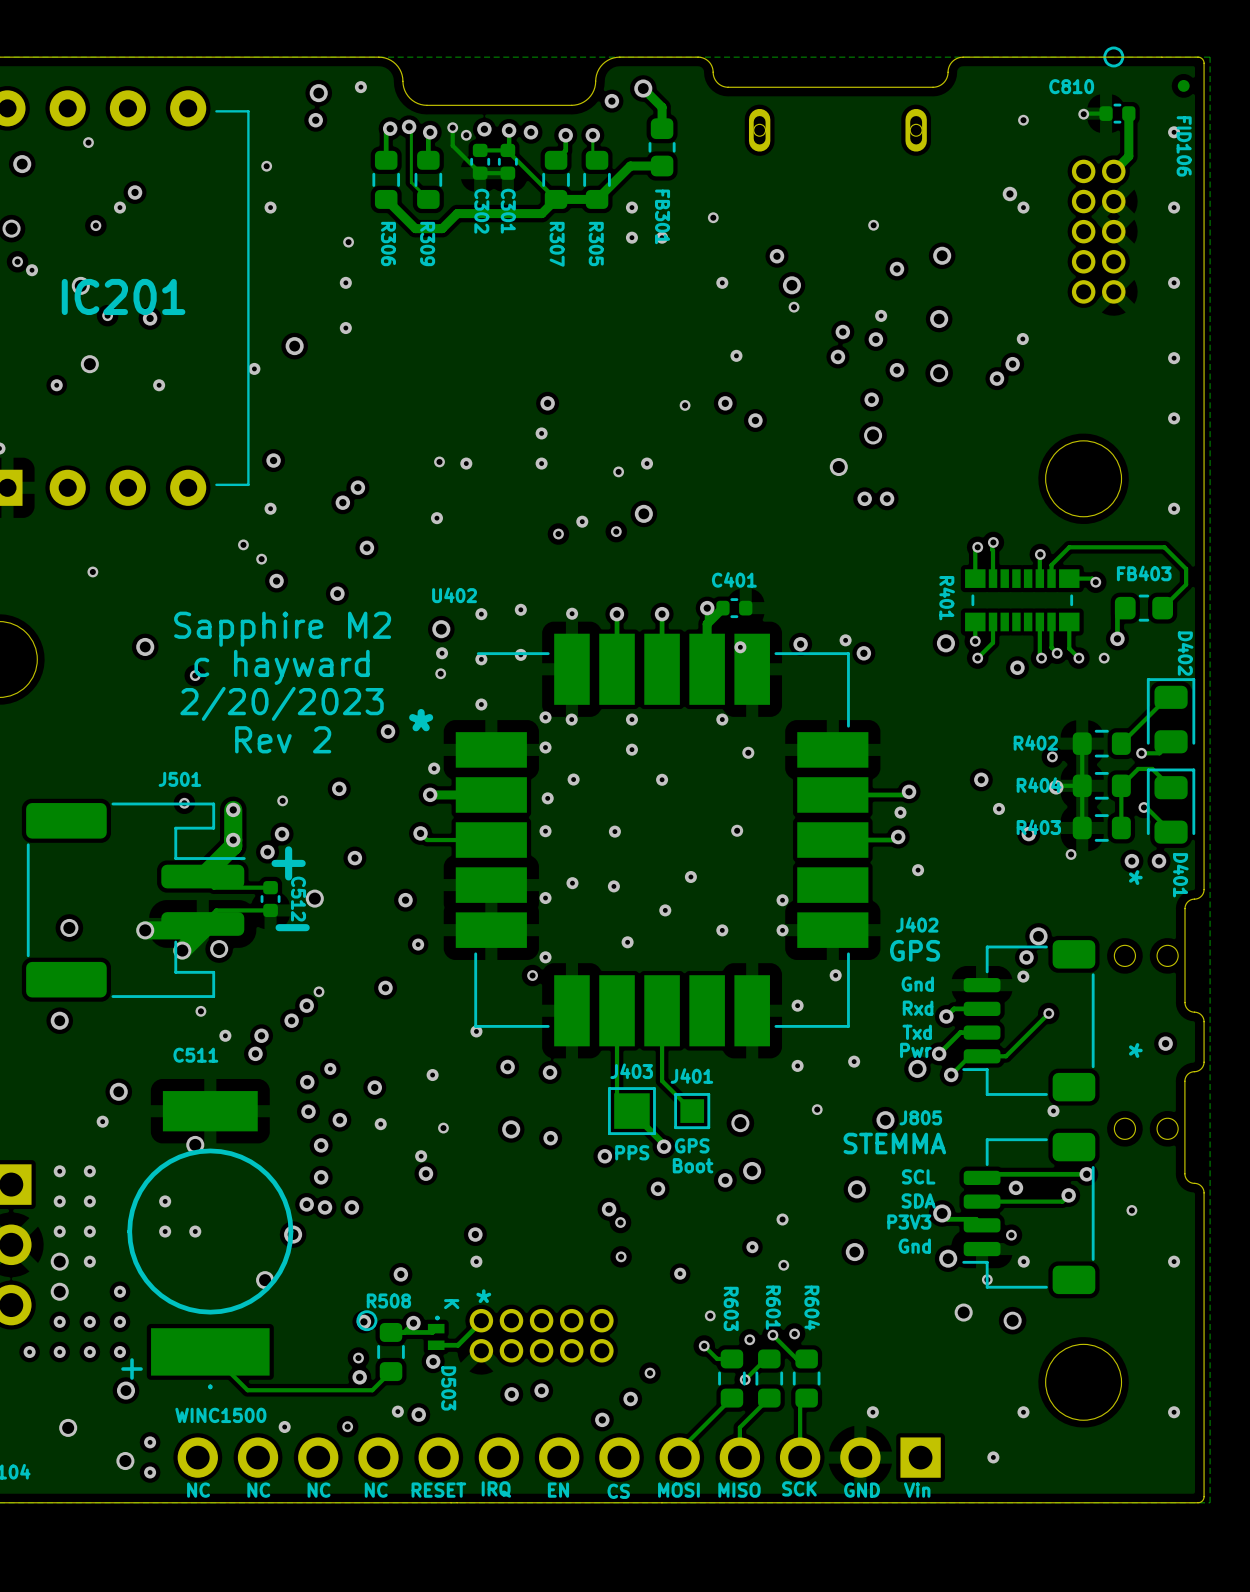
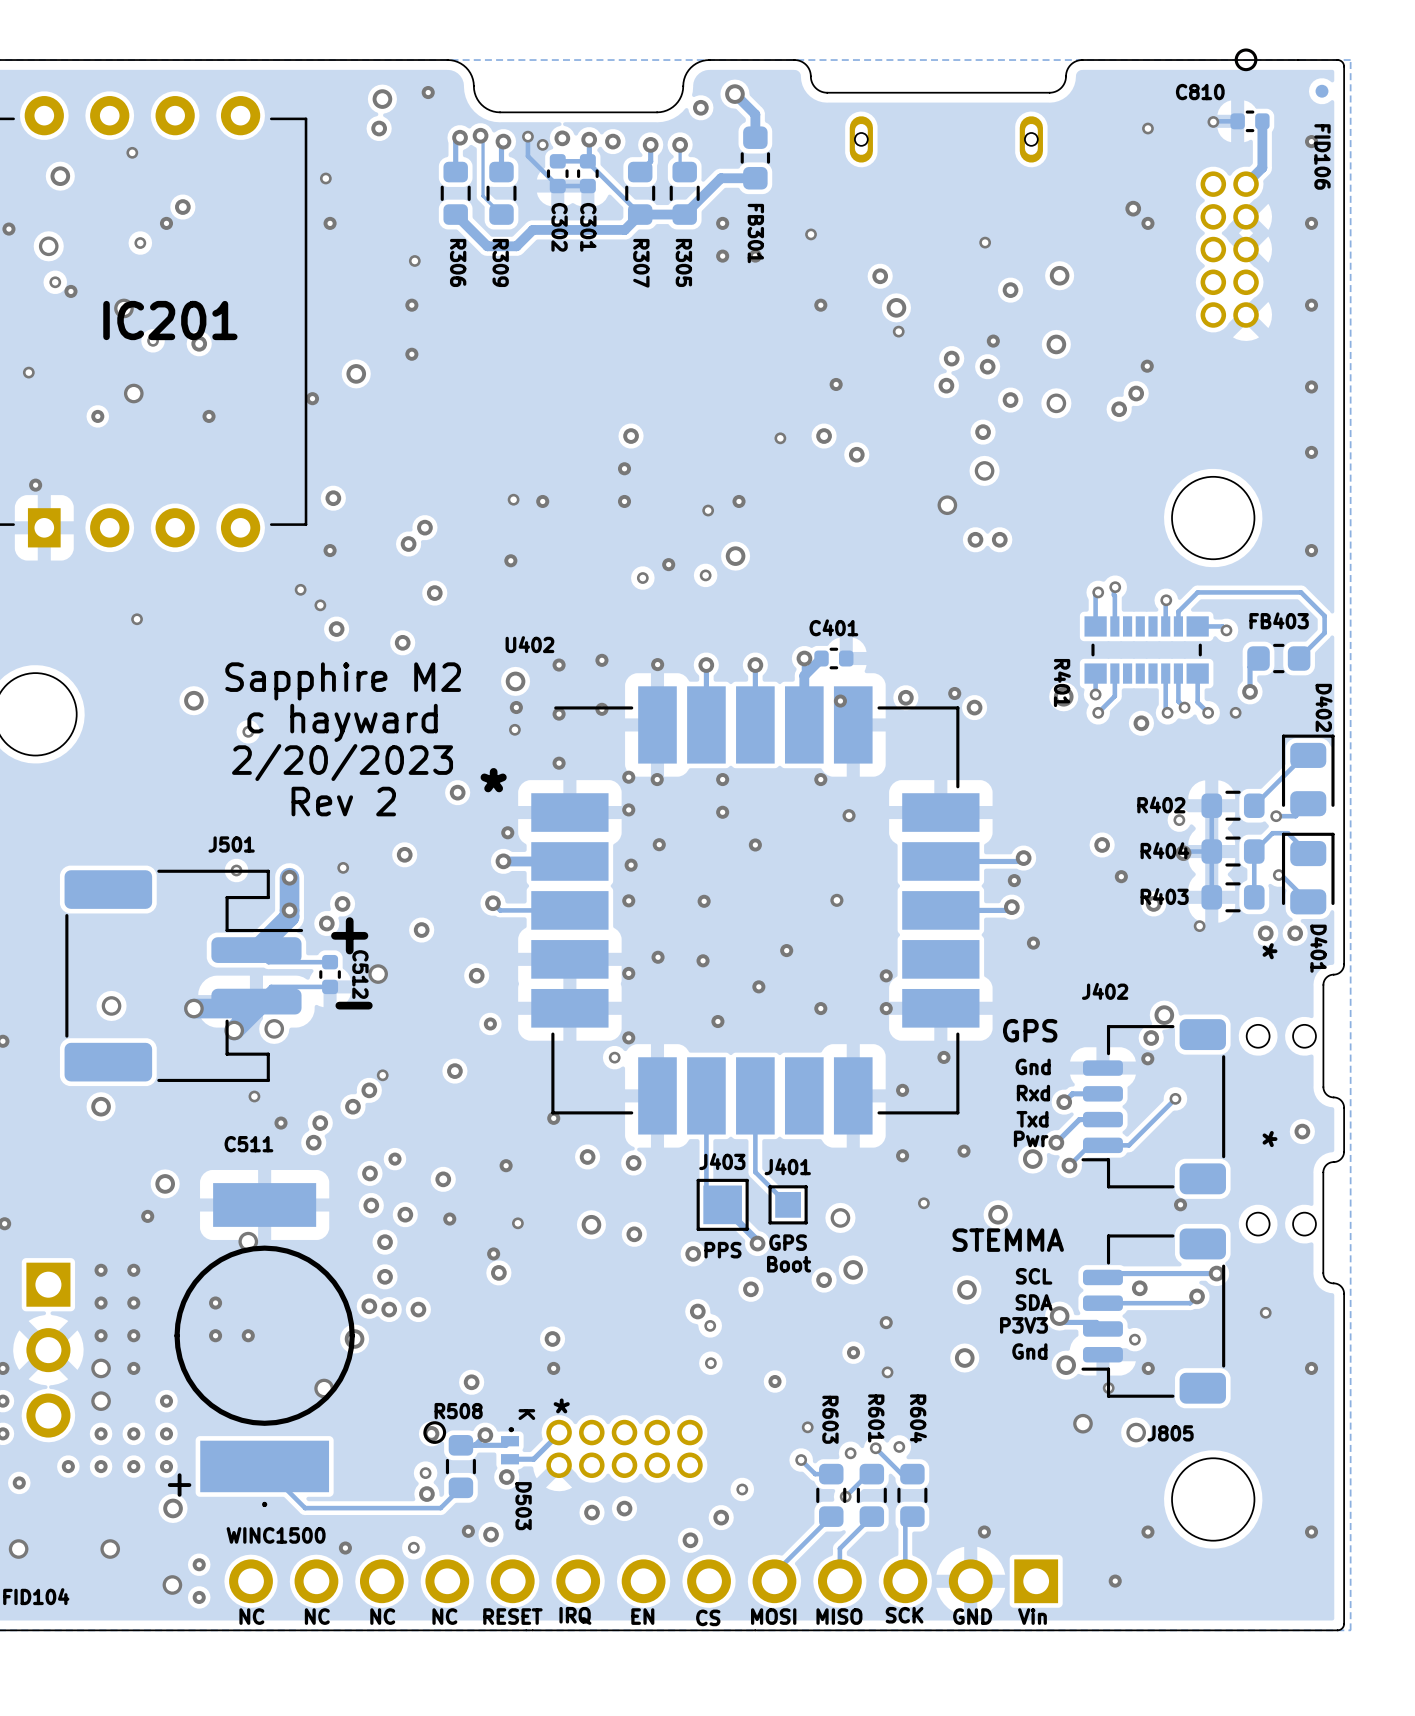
R401 name position: R401 (947, 598) -> R401 (1062, 683)
J402 name position: J402 (917, 924) -> J402 (1105, 991)
J805 name position: J805 (920, 1117) -> J805 (1170, 1433)

